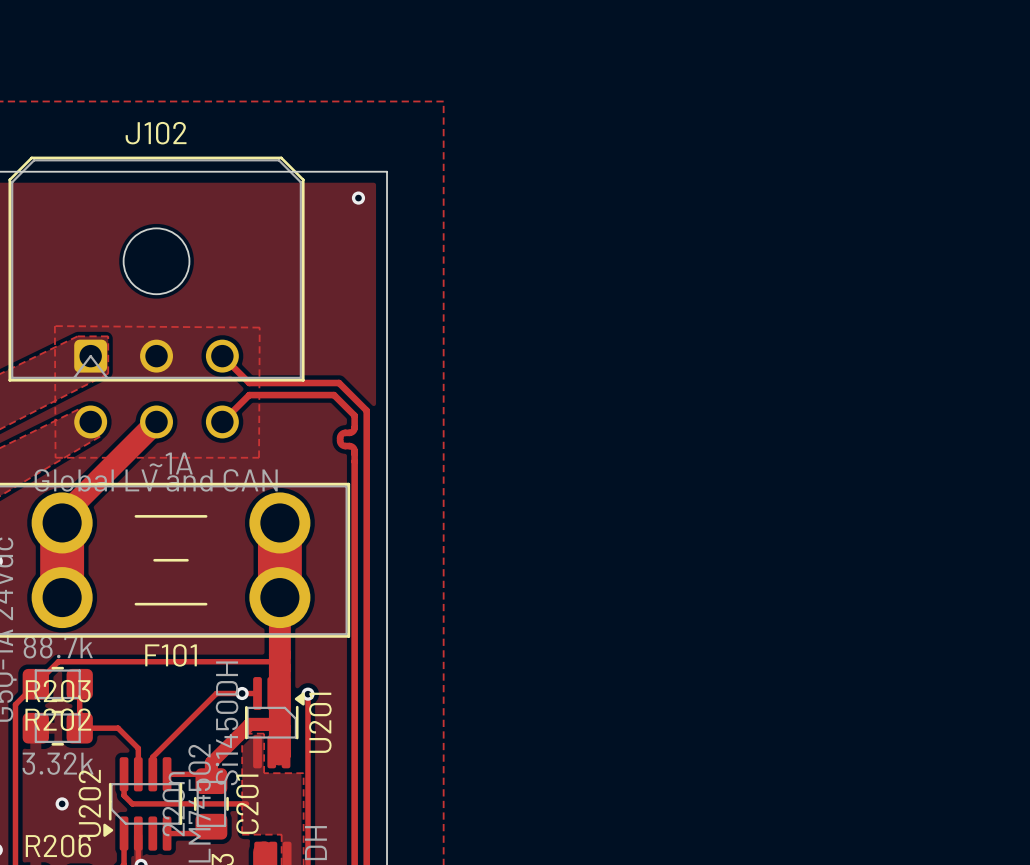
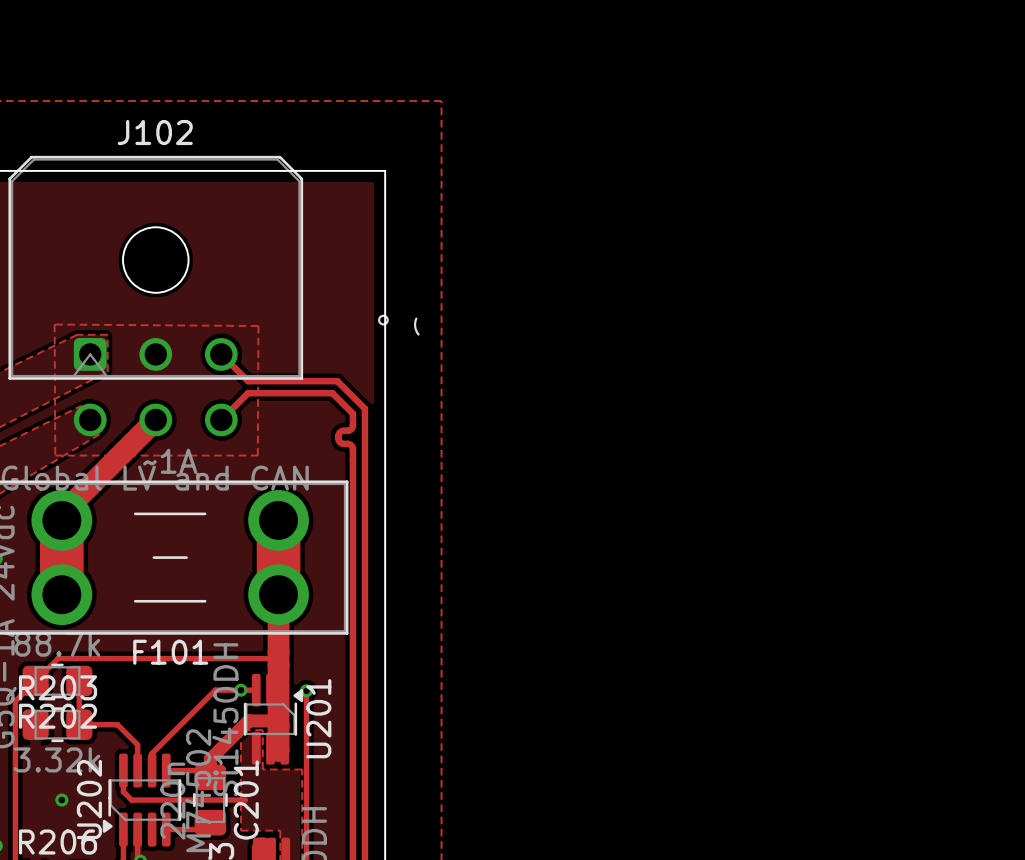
via: (358, 198) -> none
drawing: none -> [378, 314, 389, 326]
line: none -> (416, 318) (415, 326) (418, 334)

